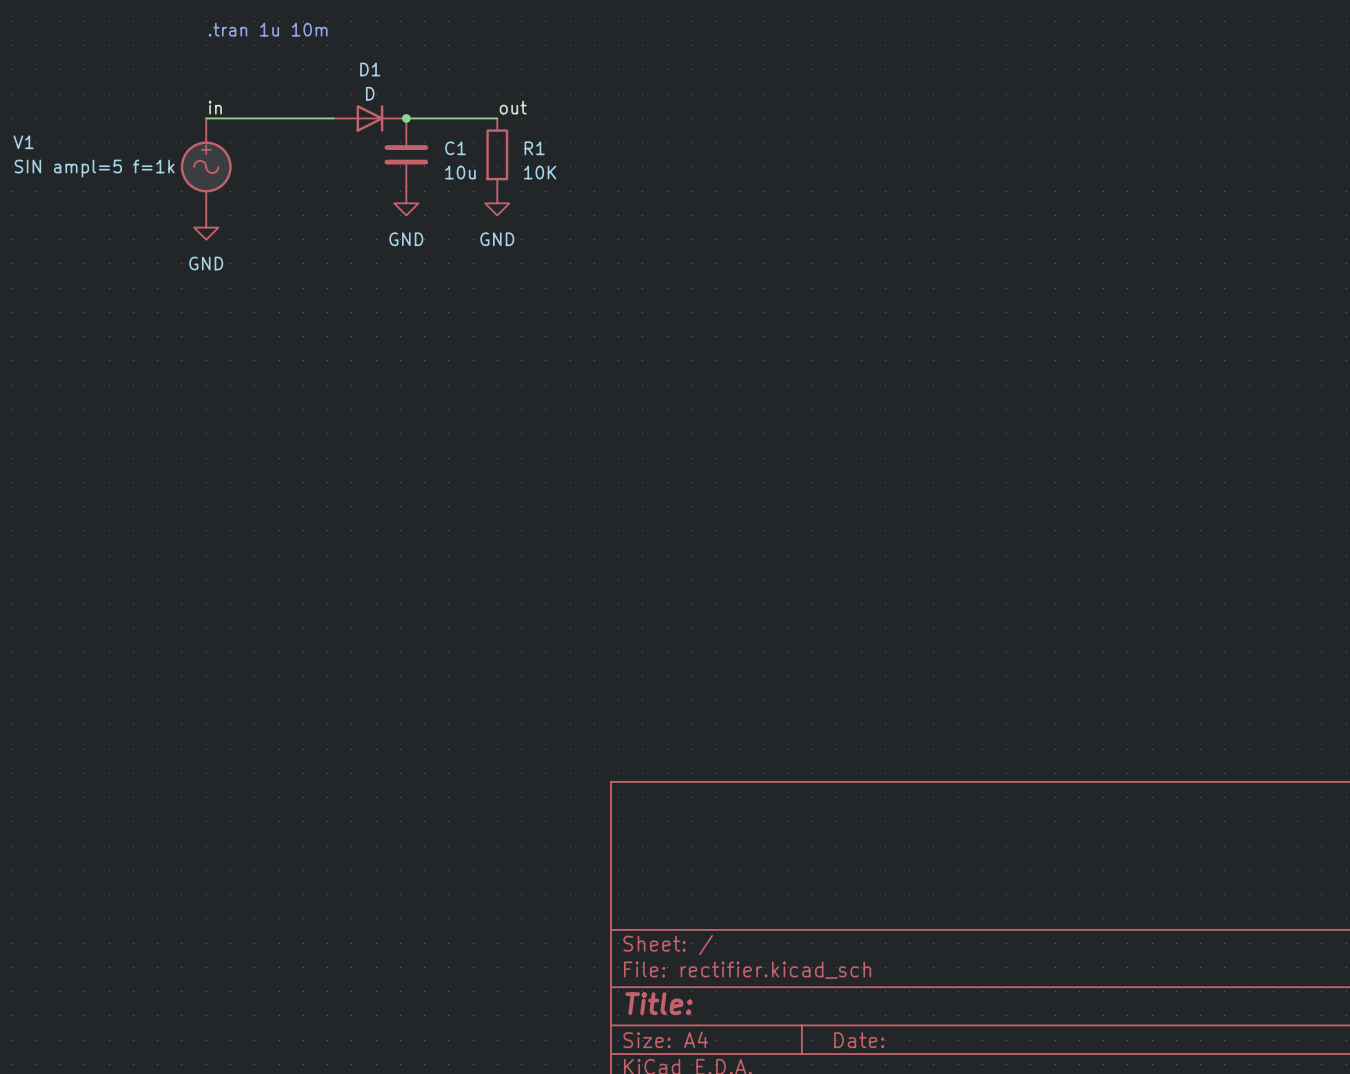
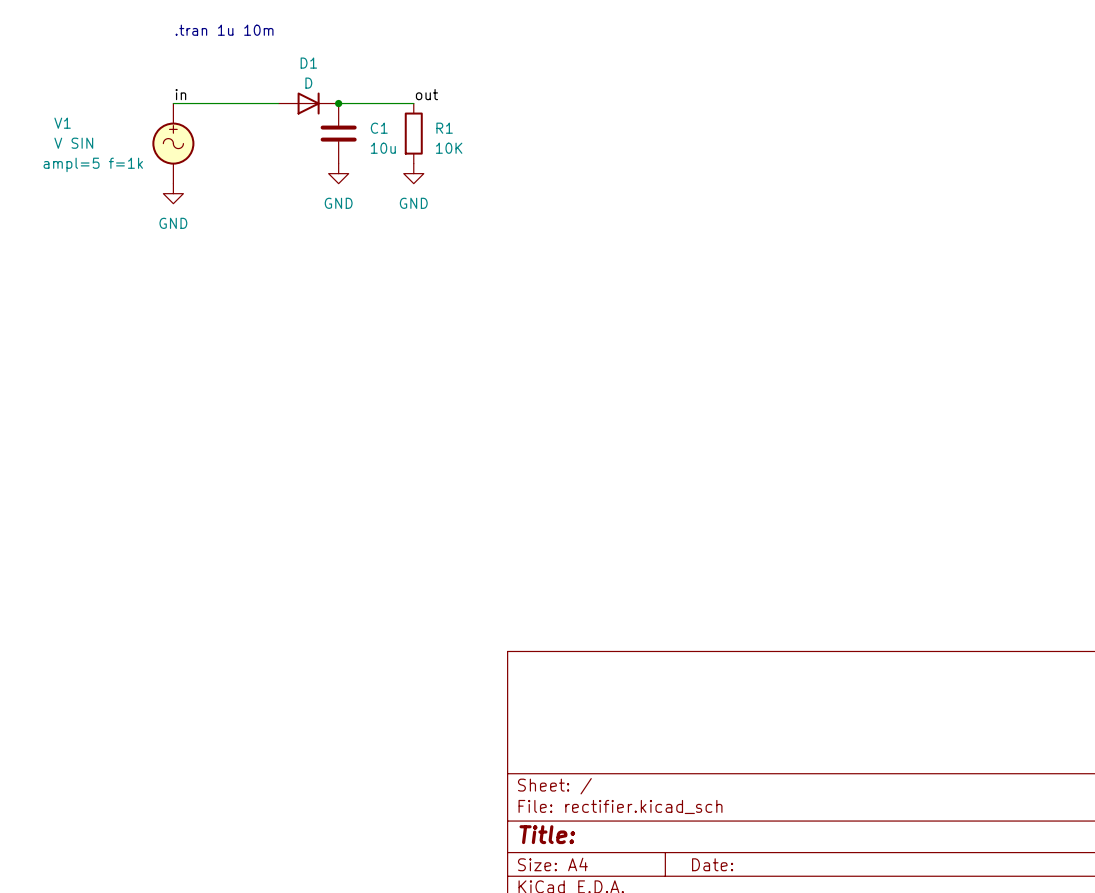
V1 name position: V1 (23, 142) -> V1 (62, 123)
V1 value: SIN ampl=5 f=1k (94, 168) -> V SIN (73, 143)
V1 text: none -> ampl=5 f=1k (93, 164)

